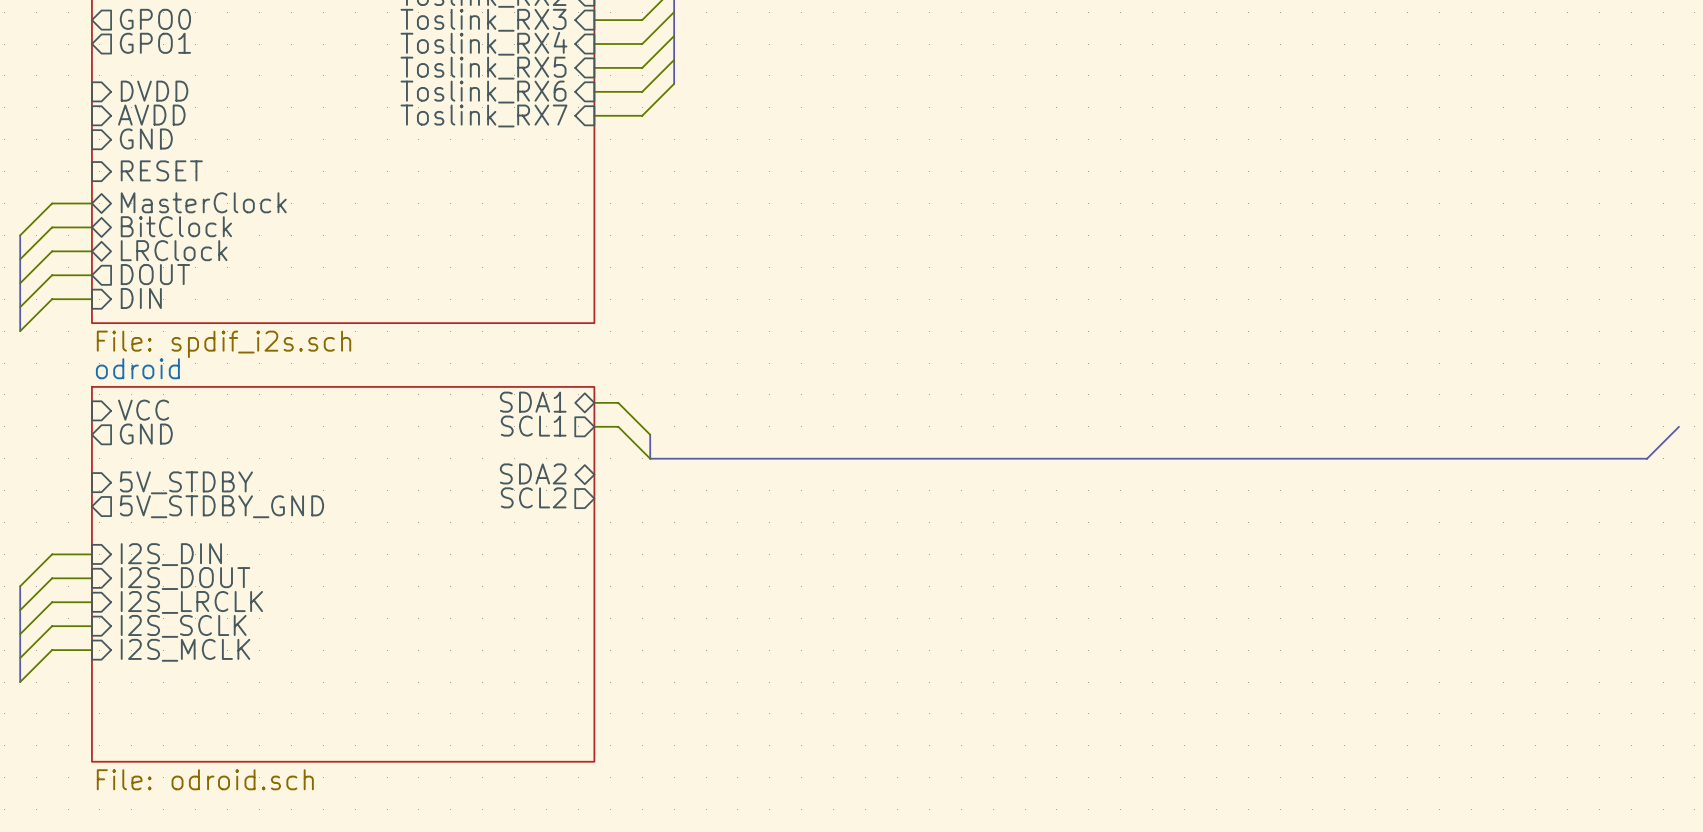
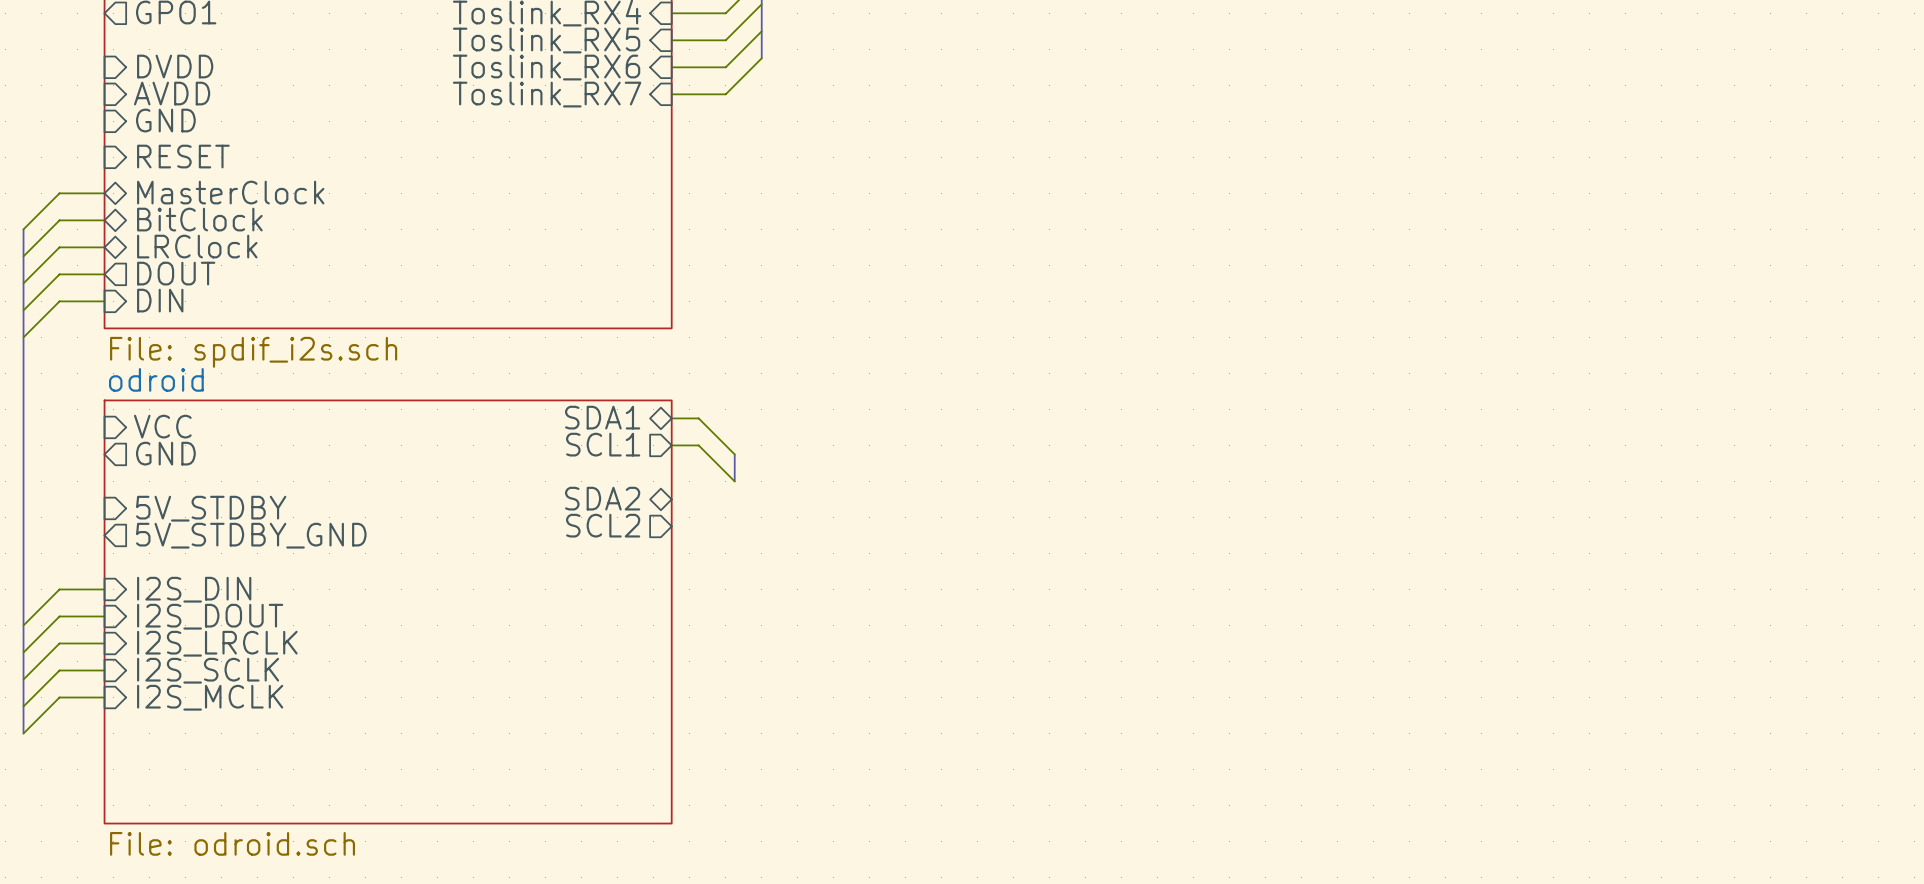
bus: none -> (23, 337) (23, 625)
bus: (1678, 426) (1647, 458) (650, 458) -> none

